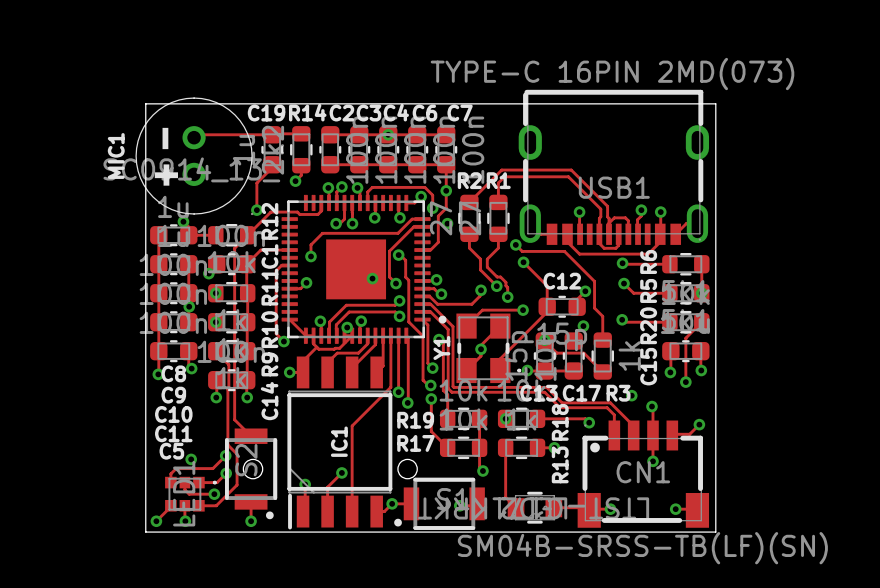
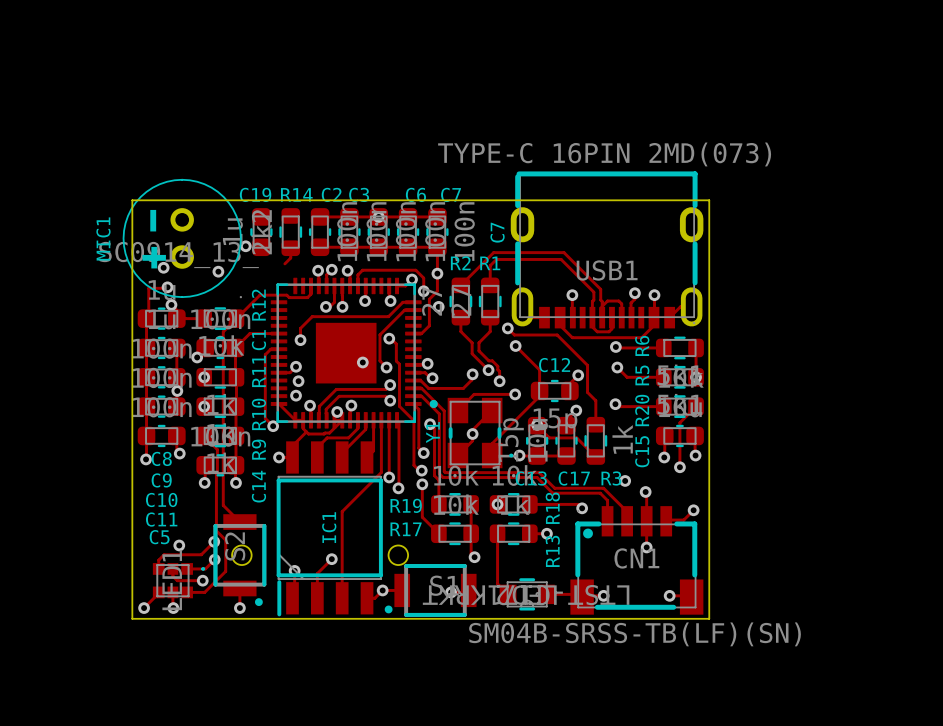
board edge: (145, 103) (715, 103) (715, 532) (145, 532) (145, 103) -> (132, 200) (132, 618) (709, 618) (709, 200) (132, 200)
C4 name: C4 (396, 112) -> C7 (497, 232)
track: (301, 133) (196, 134) (194, 137) -> none
via: none -> (245, 246)
track: (272, 164) (272, 167) (256, 183) (256, 210) -> none
via: (295, 181) -> none
via: none -> (163, 267)
via: none -> (218, 271)
track: none -> (167, 287) (148, 288) (148, 315)
via: none -> (167, 287)
via: (256, 210) -> none
via: none -> (298, 381)
via: none -> (296, 395)

